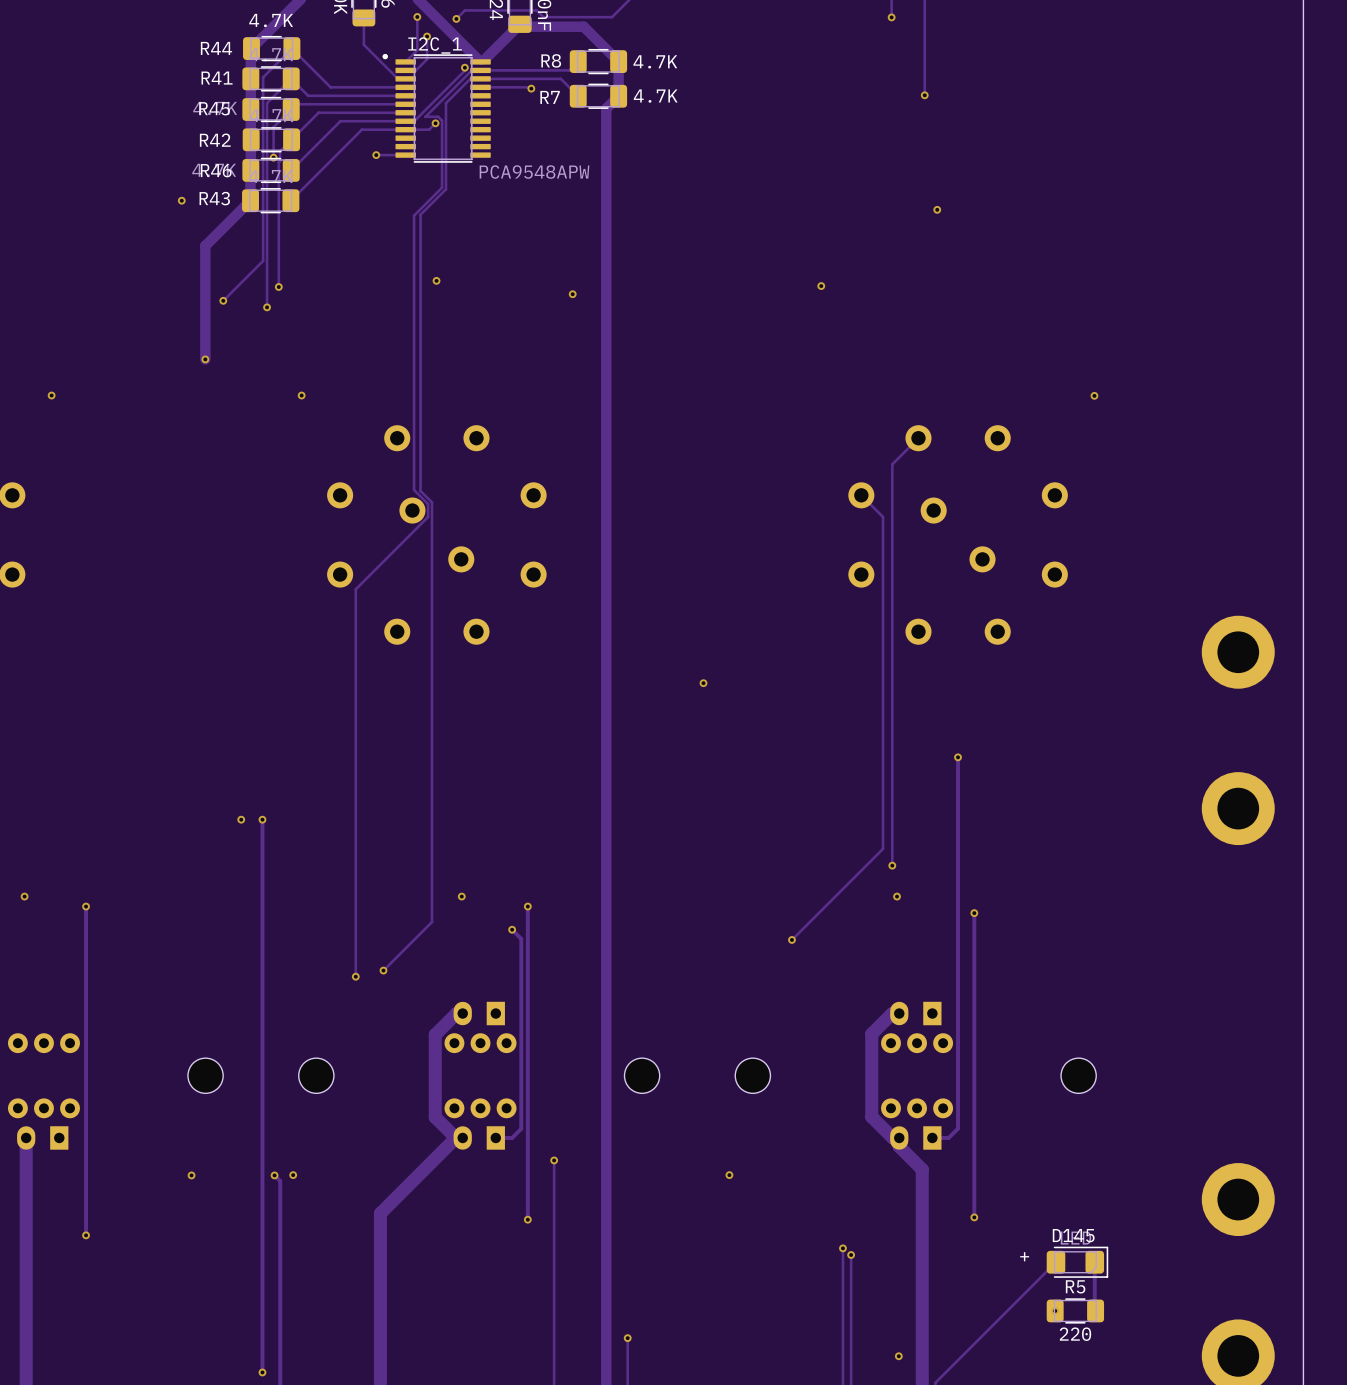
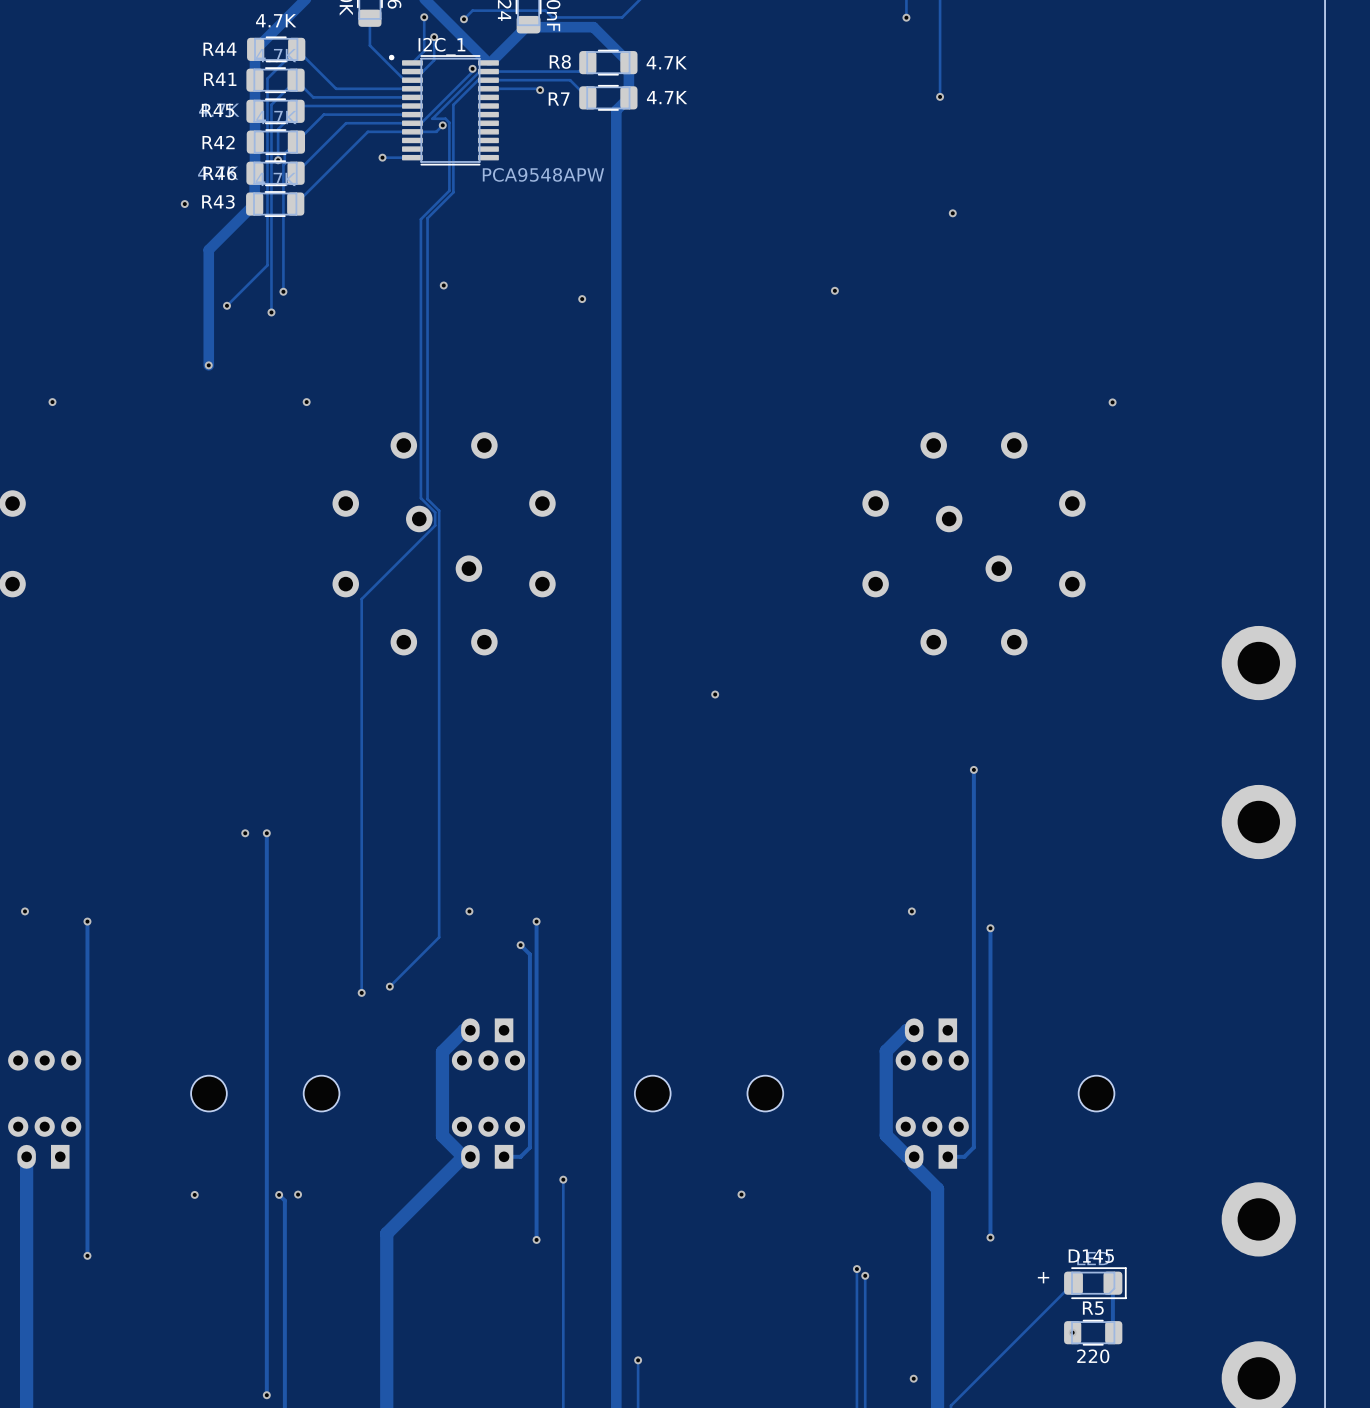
track: (918, 438) (892, 464) (892, 865) -> none
track: (861, 495) (883, 517) (883, 848) (791, 939) -> none
via: (892, 865) -> none
via: (791, 939) -> none

